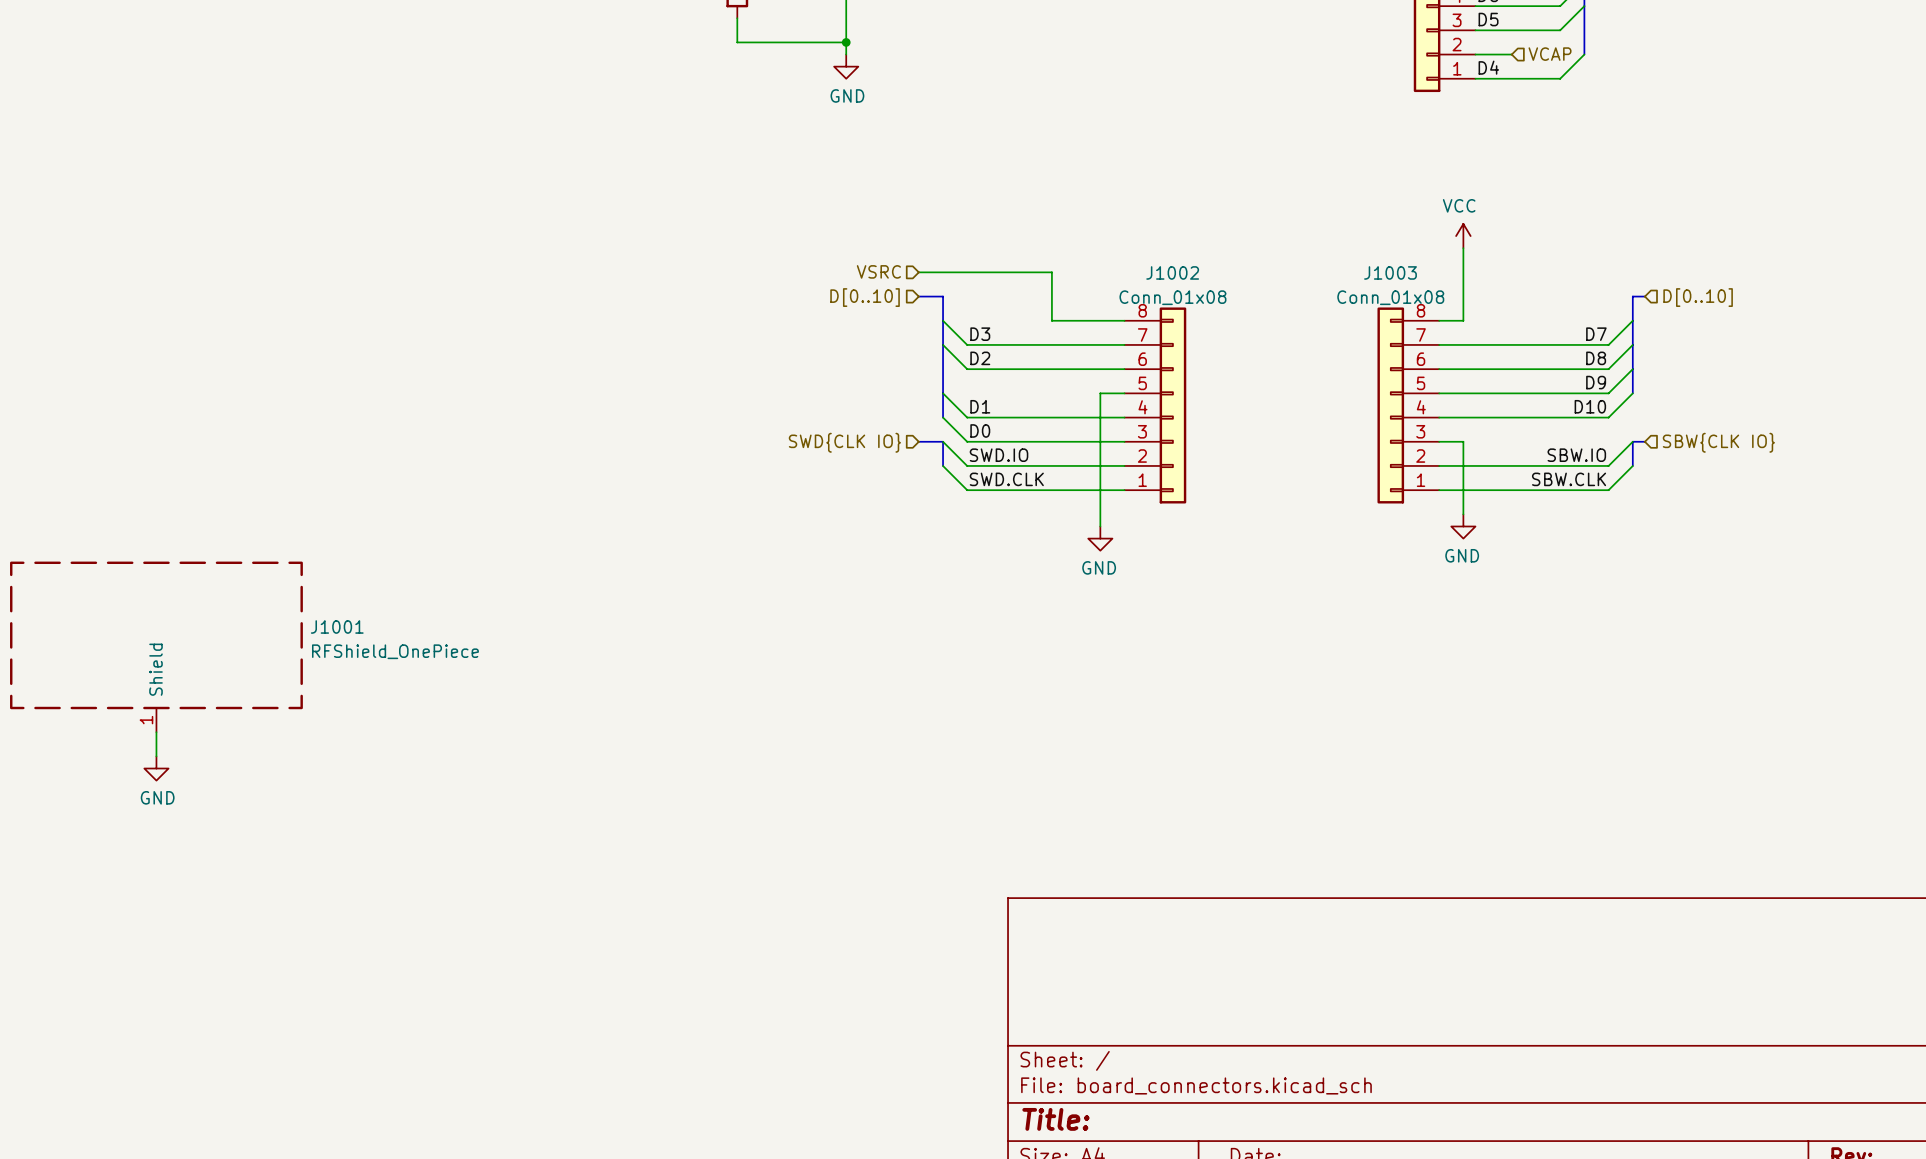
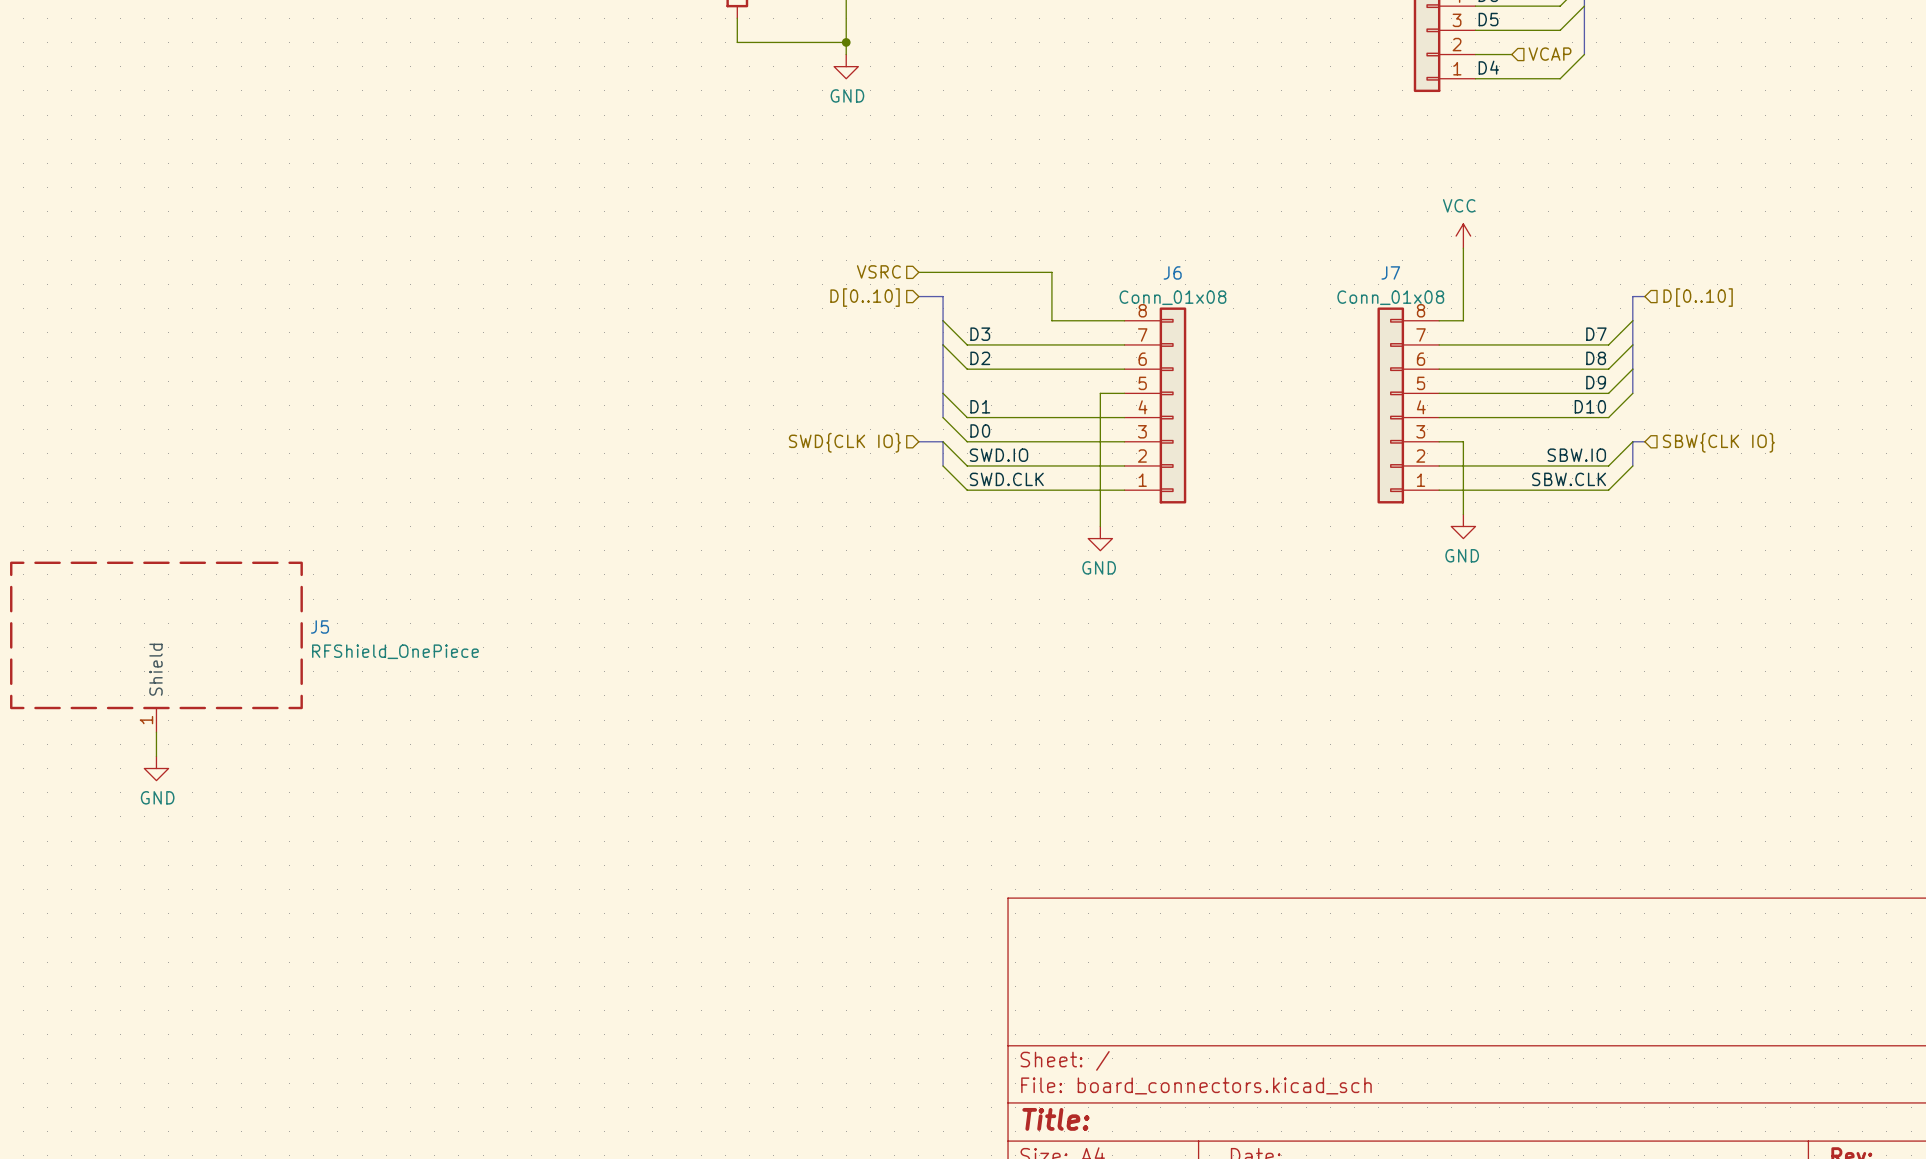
J1002 name: J1002 (1172, 272) -> J6 (1172, 272)
J1003 name: J1003 (1390, 272) -> J7 (1390, 272)
J1001 name: J1001 (337, 626) -> J5 (319, 626)

